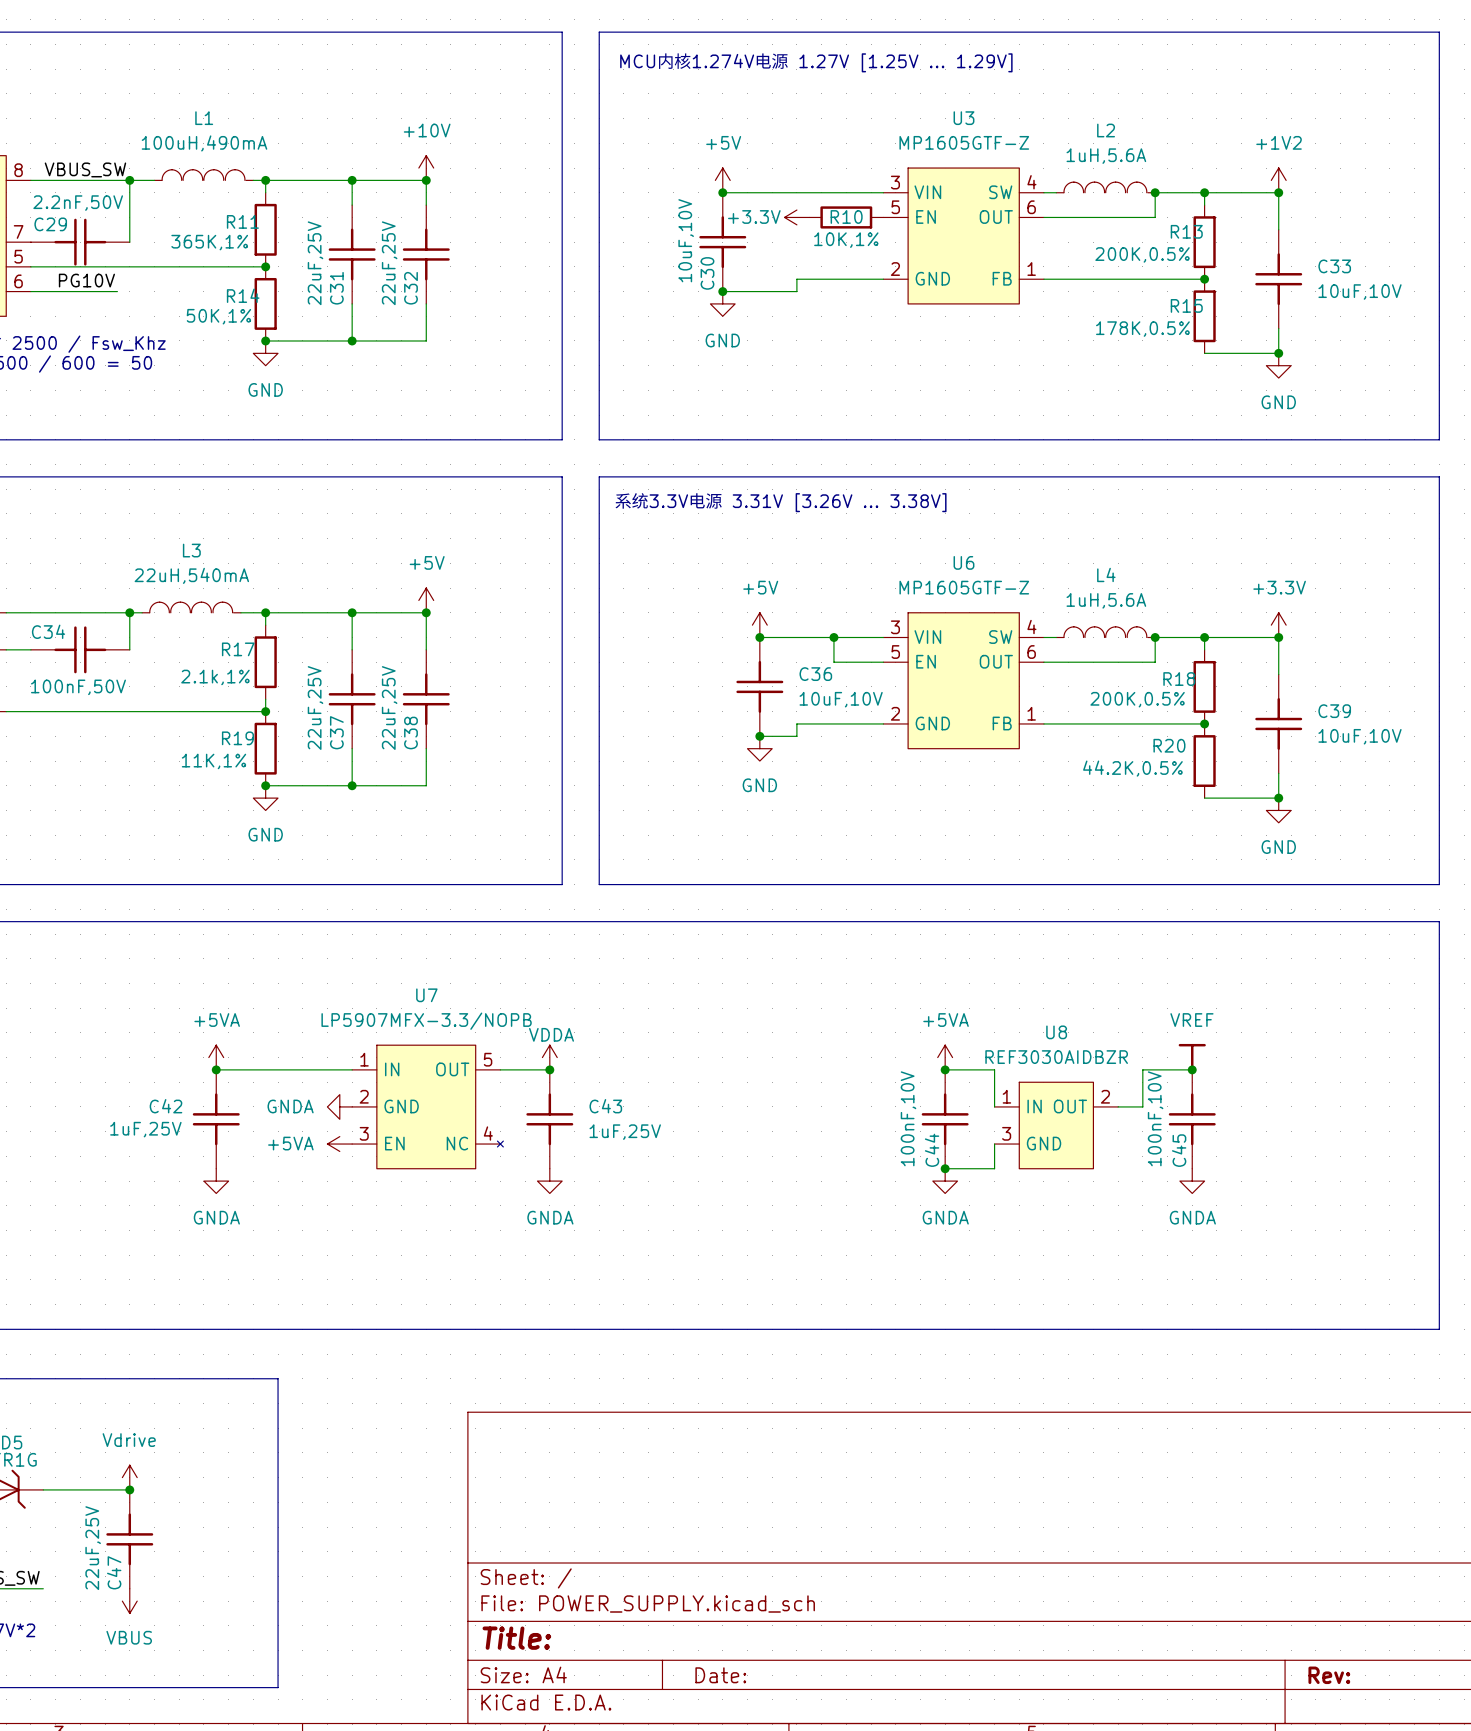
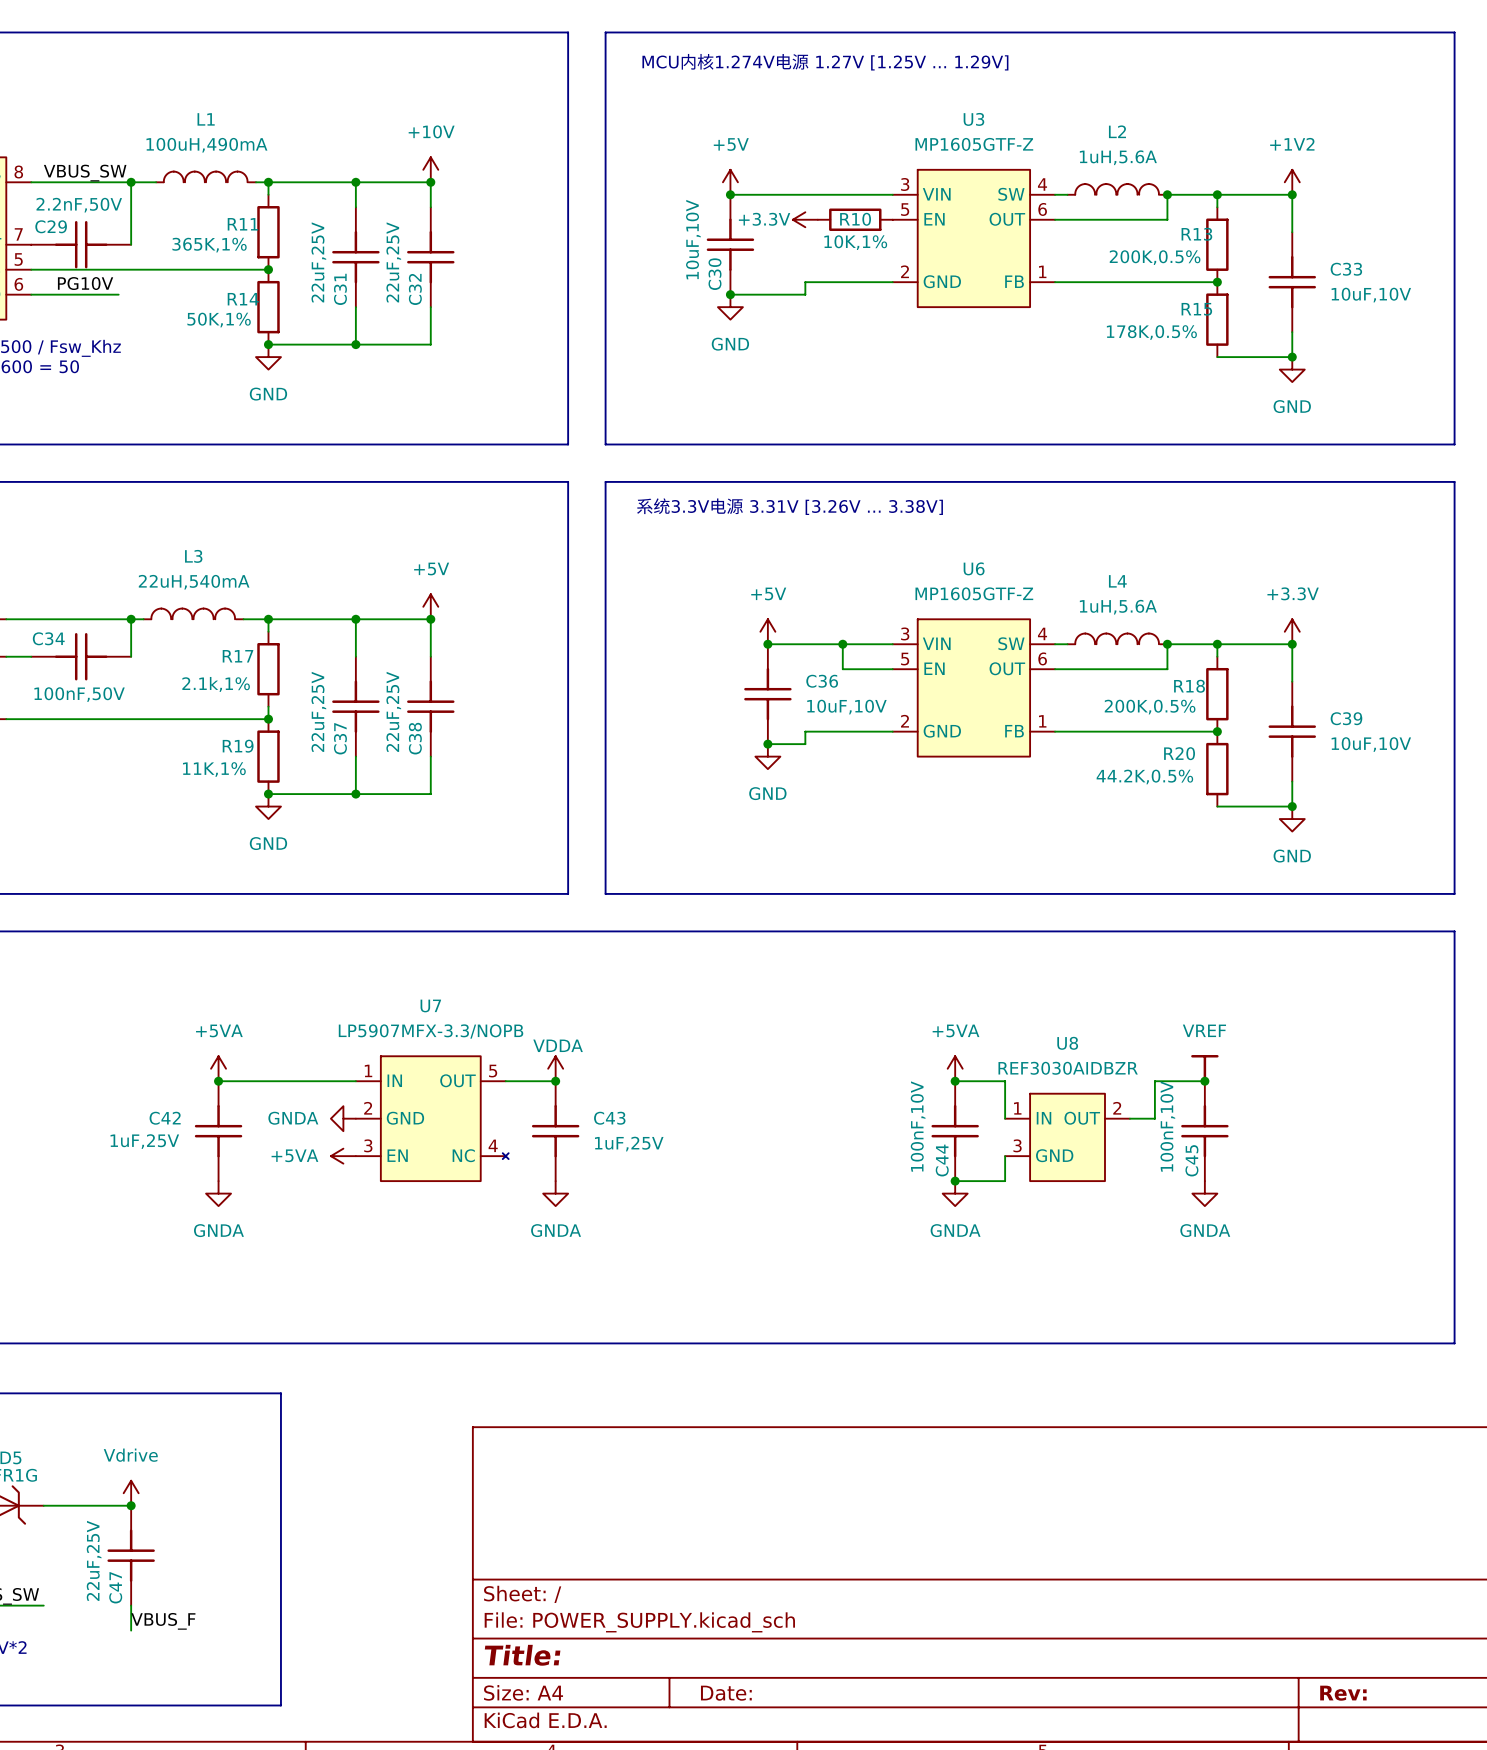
power symbol: VBUS (129, 1601) -> none
label: none -> VBUS_F (163, 1621)

